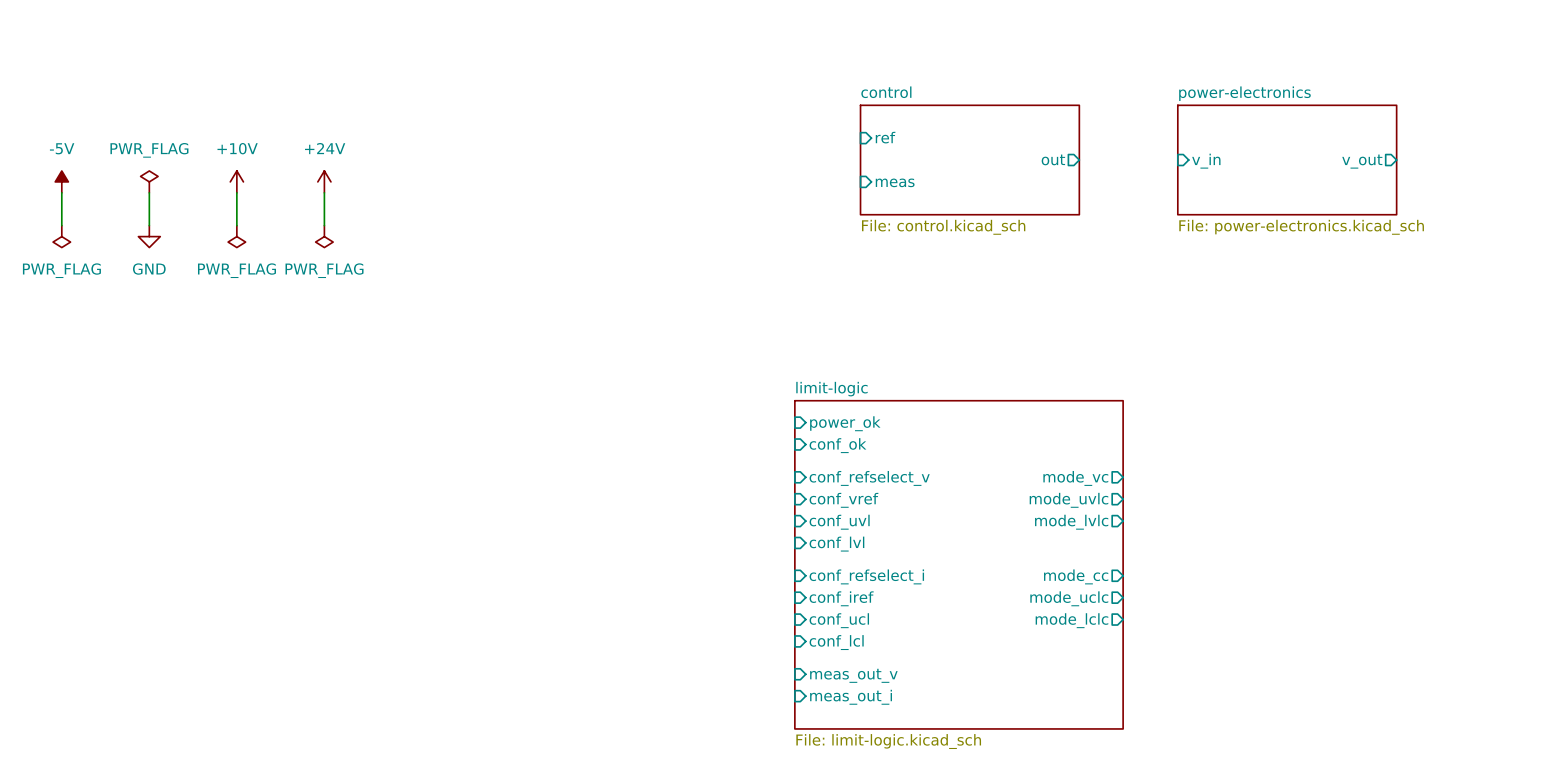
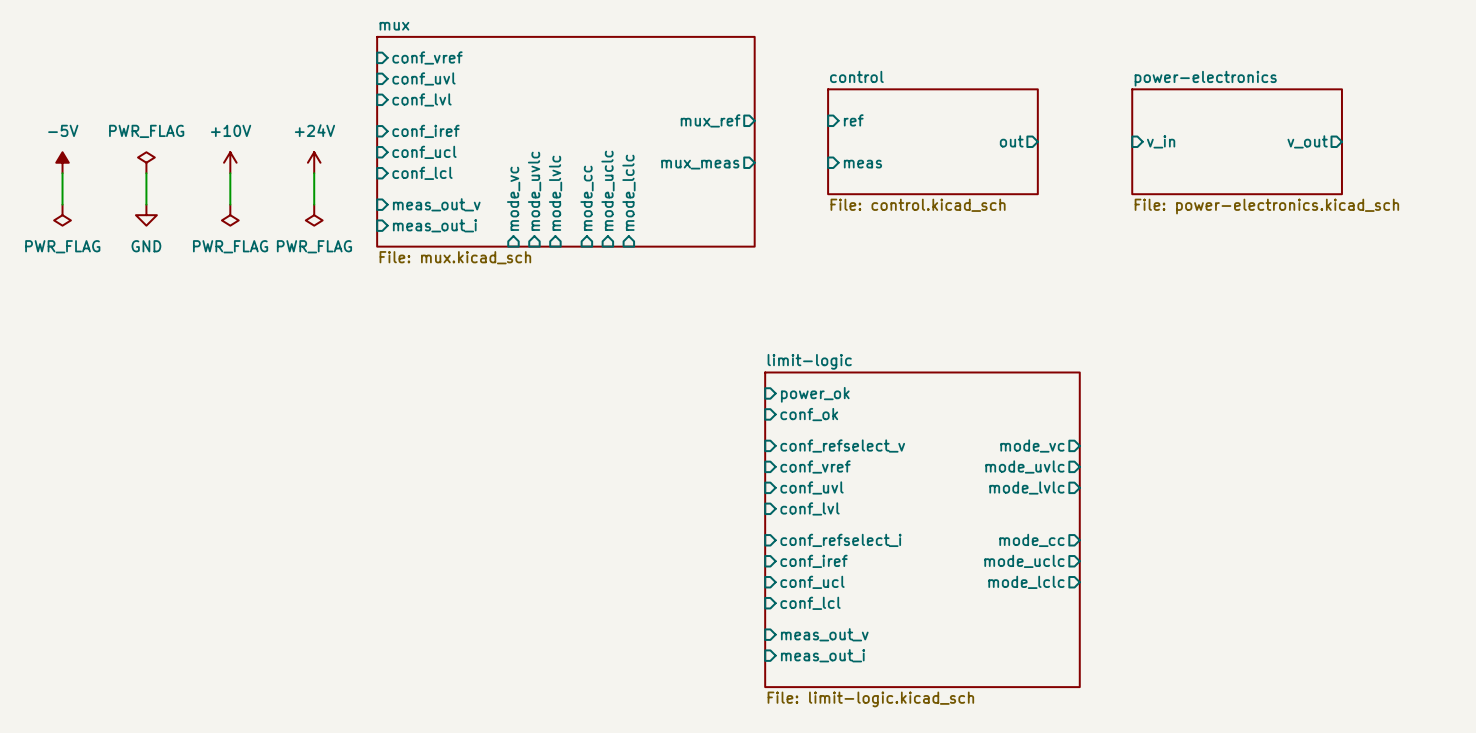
sheet pin: none -> conf_vref (427, 57)
sheet pin: none -> conf_uvl (423, 78)
sheet pin: none -> conf_lvl (422, 99)
sheet pin: none -> mux_ref (710, 120)
sheet pin: none -> conf_iref (425, 131)
sheet mux: none -> File: mux.kicad_sch (565, 141)
sheet pin: none -> conf_ucl (424, 152)
sheet pin: none -> mux_meas (700, 164)
sheet pin: none -> conf_lcl (422, 173)
sheet pin: none -> mode_uvlc (534, 191)
sheet pin: none -> mode_uclc (607, 190)
sheet pin: none -> mode_lvlc (555, 193)
sheet pin: none -> mode_lclc (628, 192)
sheet pin: none -> mode_vc (513, 198)
sheet pin: none -> mode_cc (586, 198)
sheet pin: none -> meas_out_v (436, 204)
sheet pin: none -> meas_out_i (434, 225)

